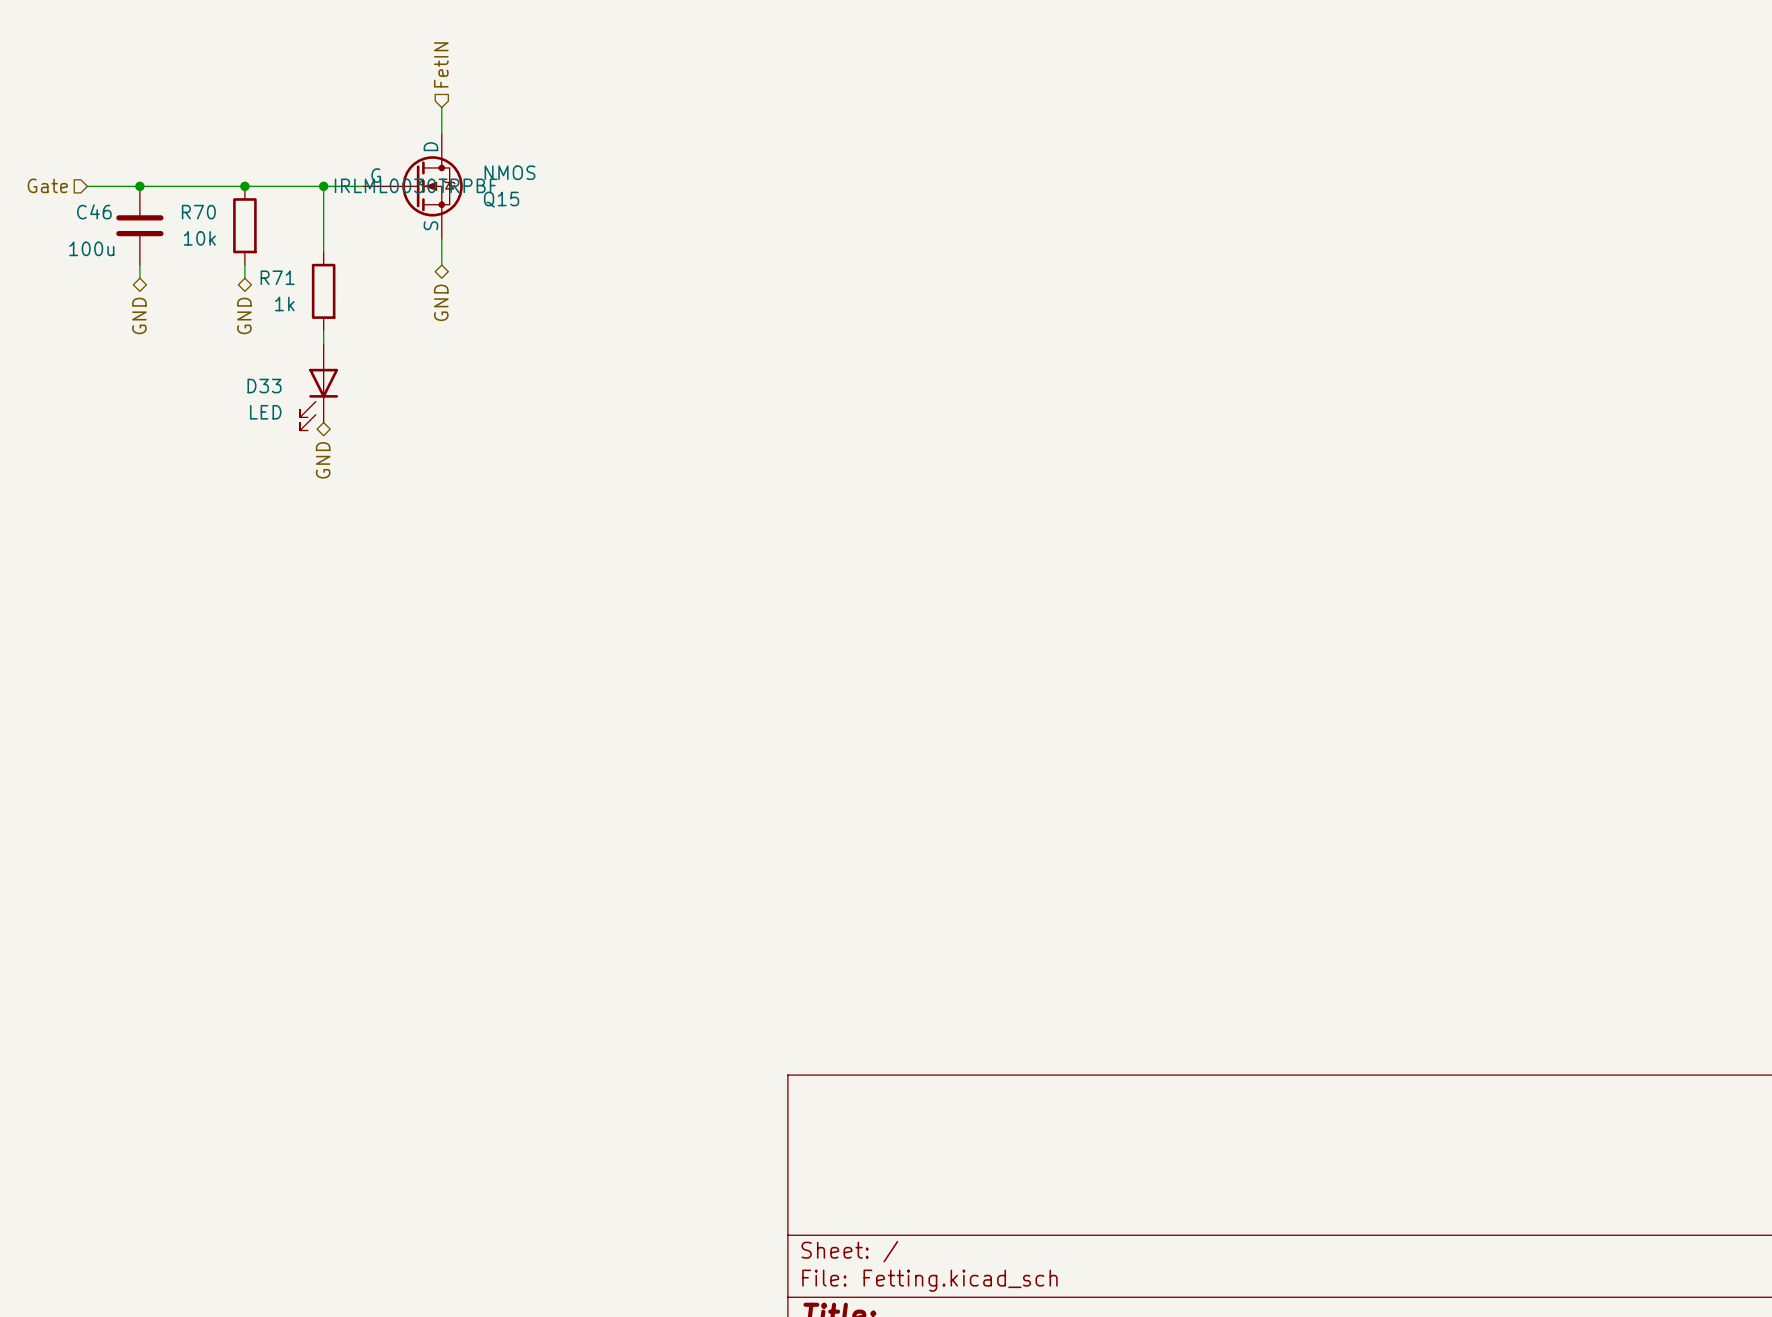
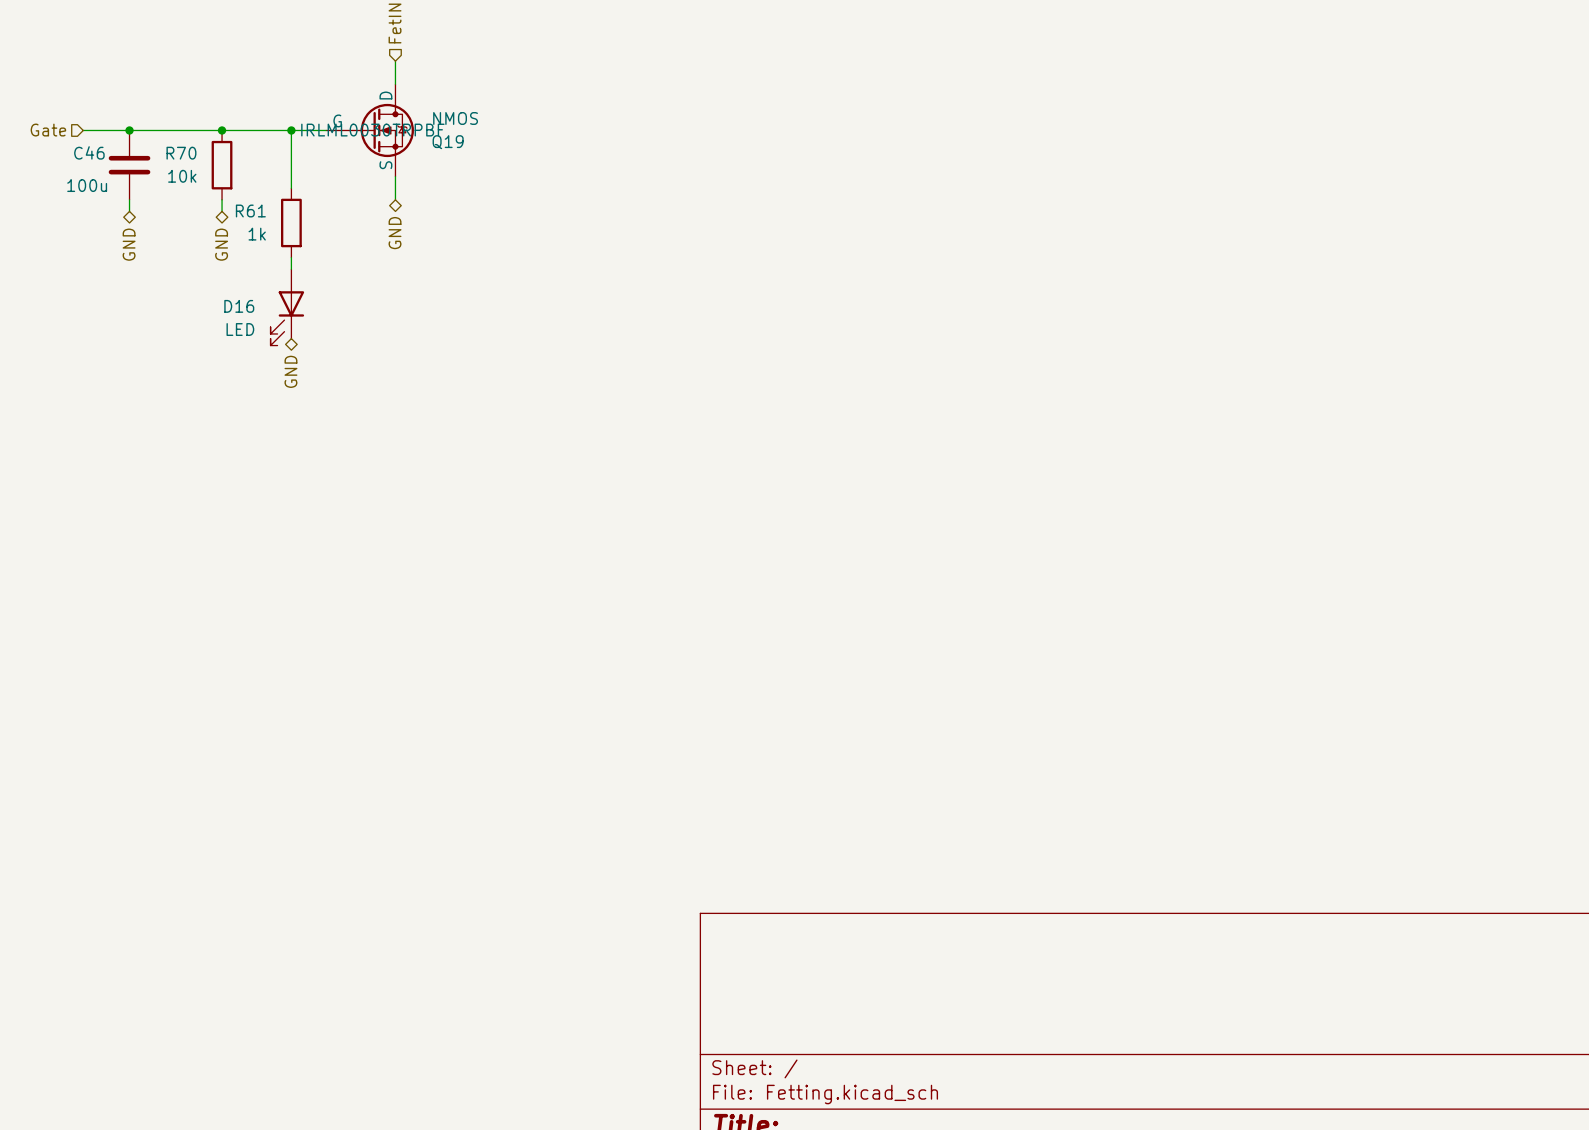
Q15 name: Q15 (501, 199) -> Q19 (448, 142)
R71 name: R71 (277, 277) -> R61 (250, 210)
D33 name: D33 (264, 386) -> D16 (239, 306)

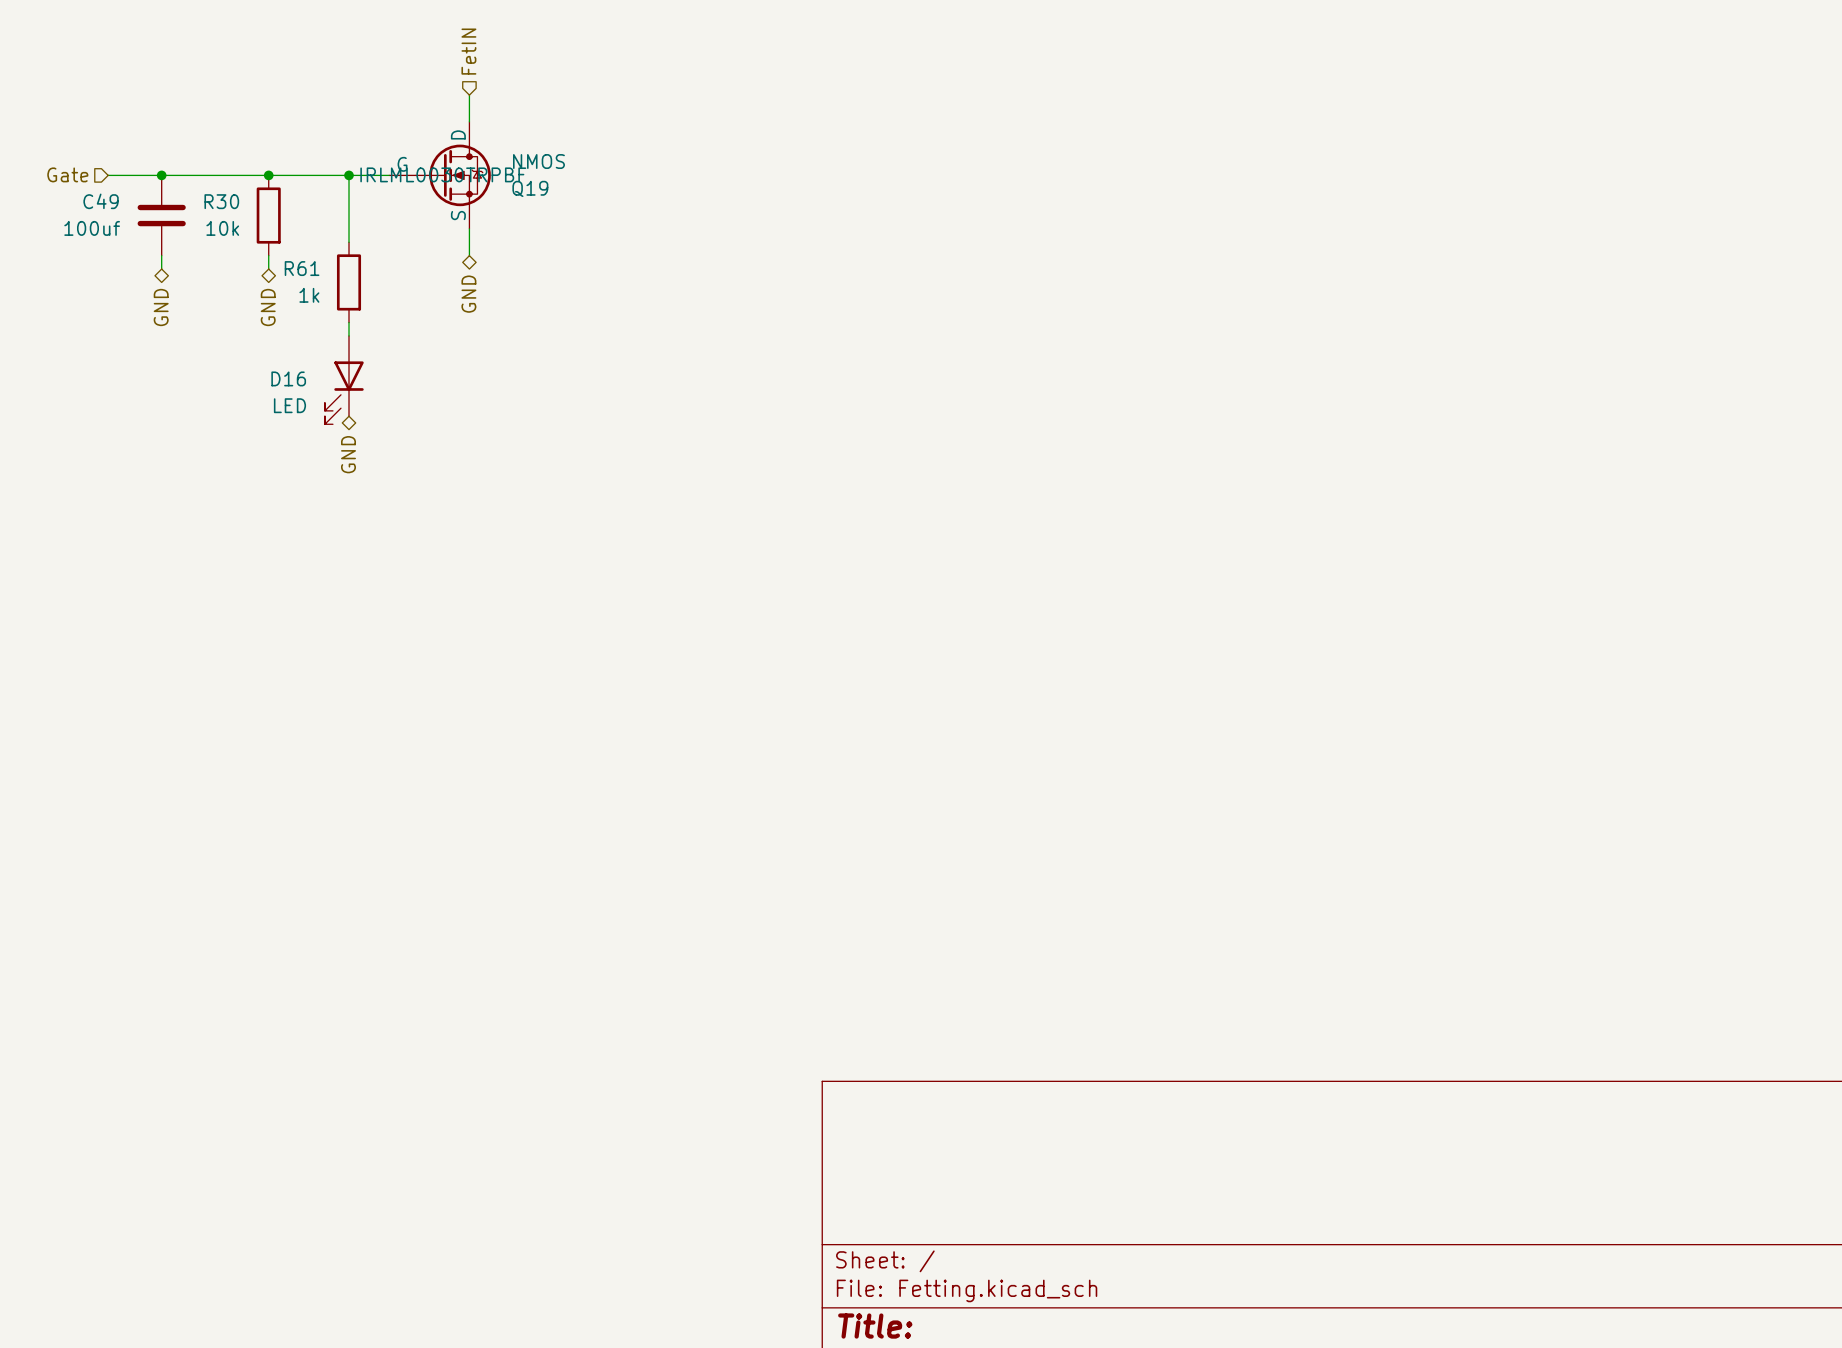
C46 name: C46 (89, 152) -> C49 (101, 201)
R70 name: R70 (181, 153) -> R30 (221, 201)
C46 value: 100u (87, 185) -> 100uf (92, 228)

